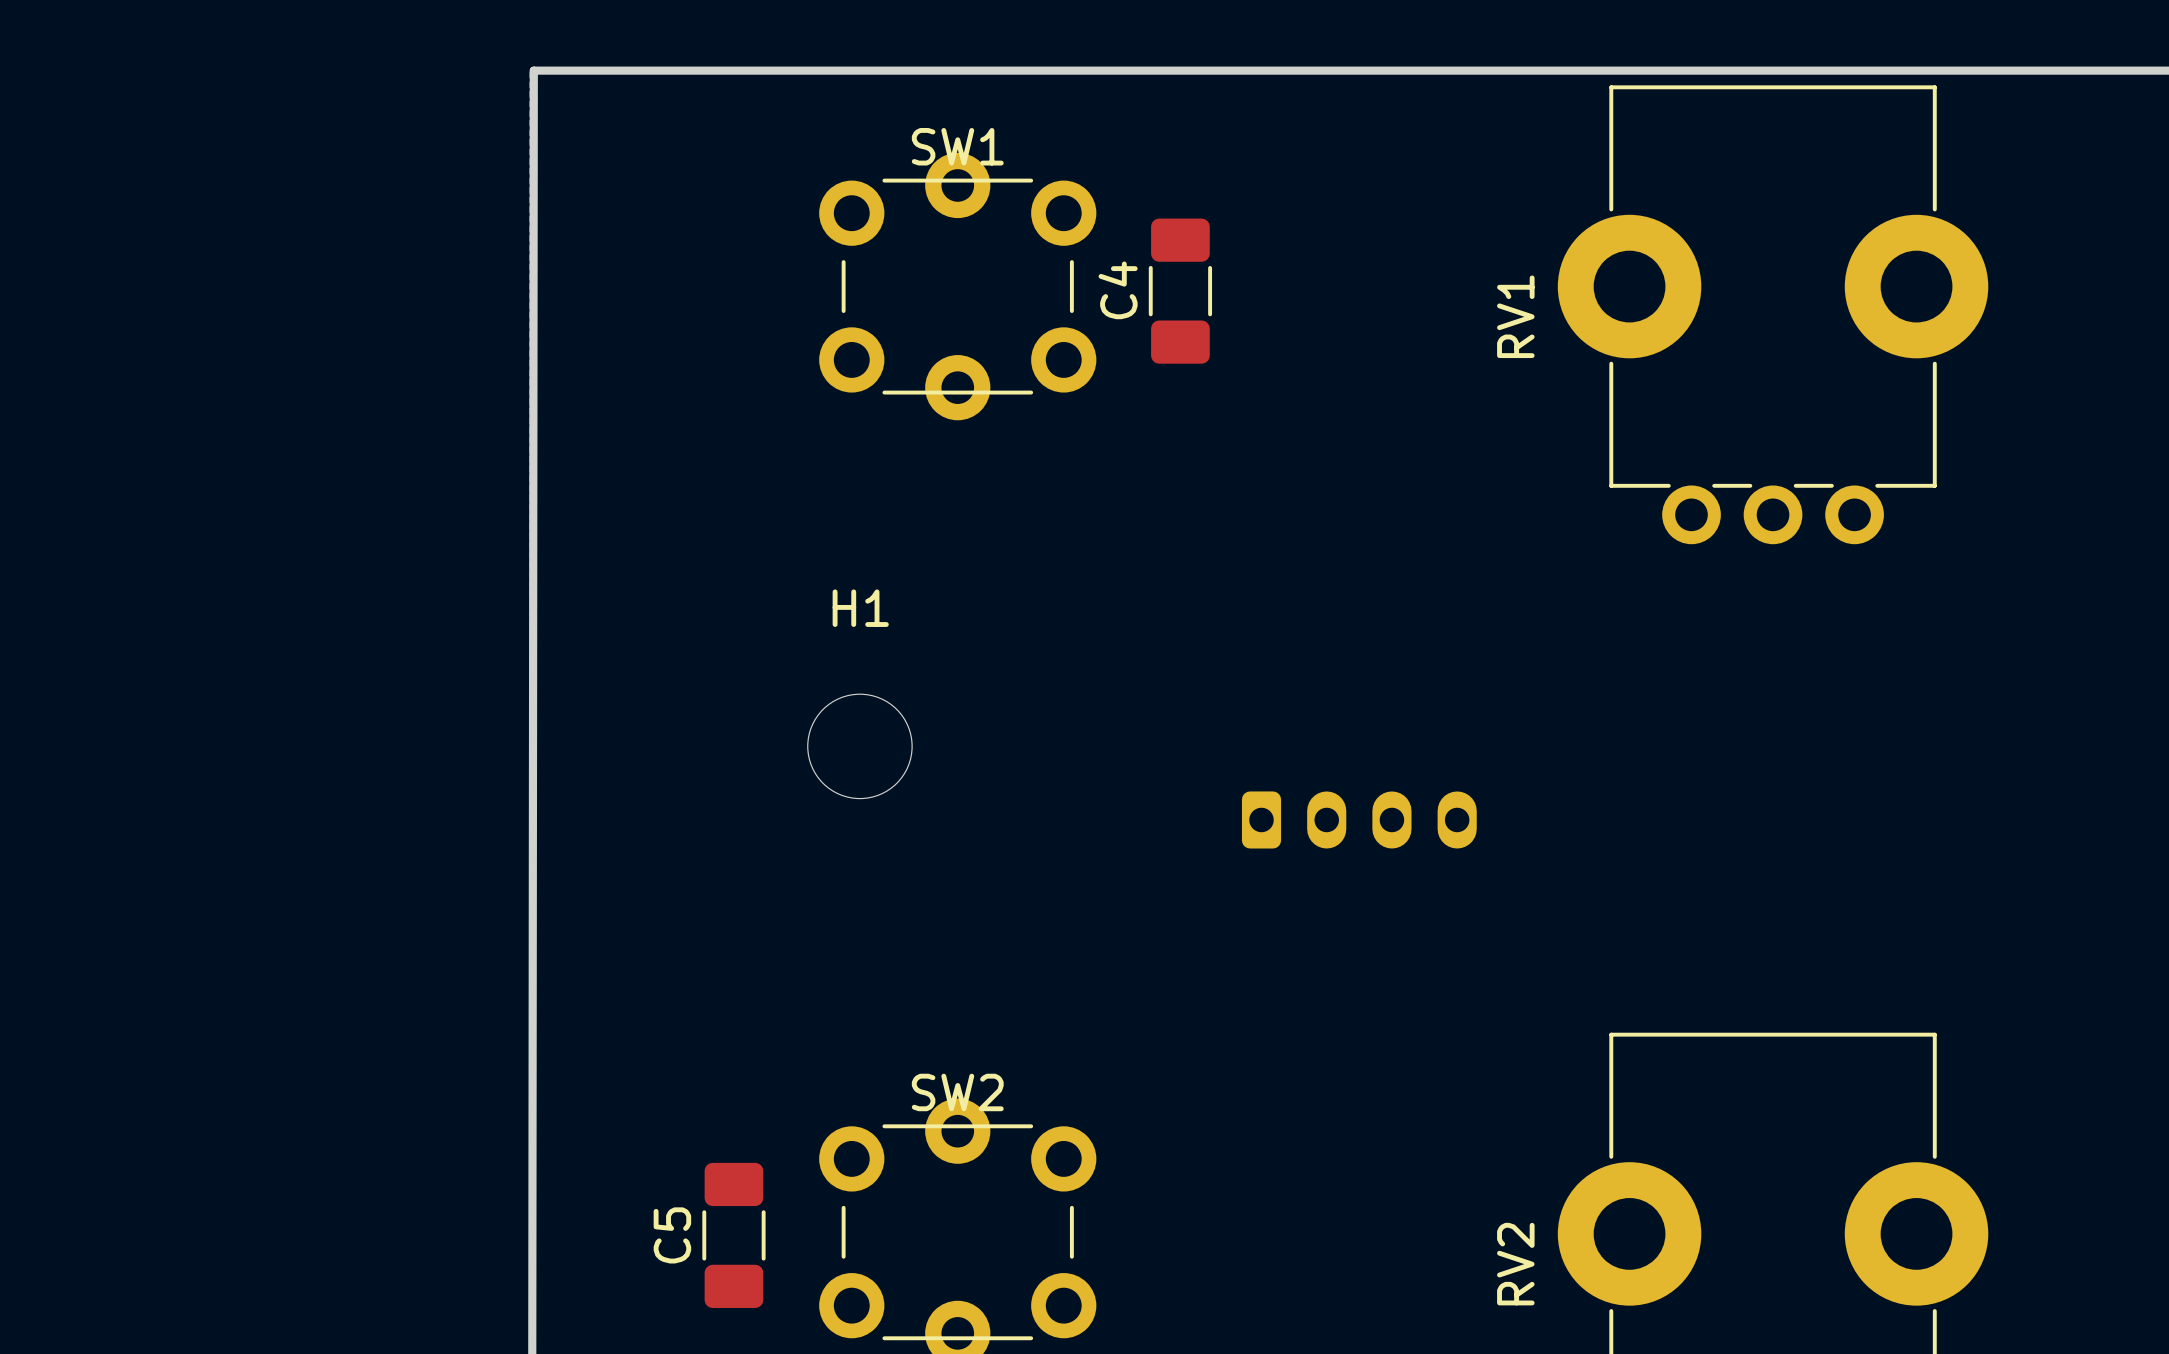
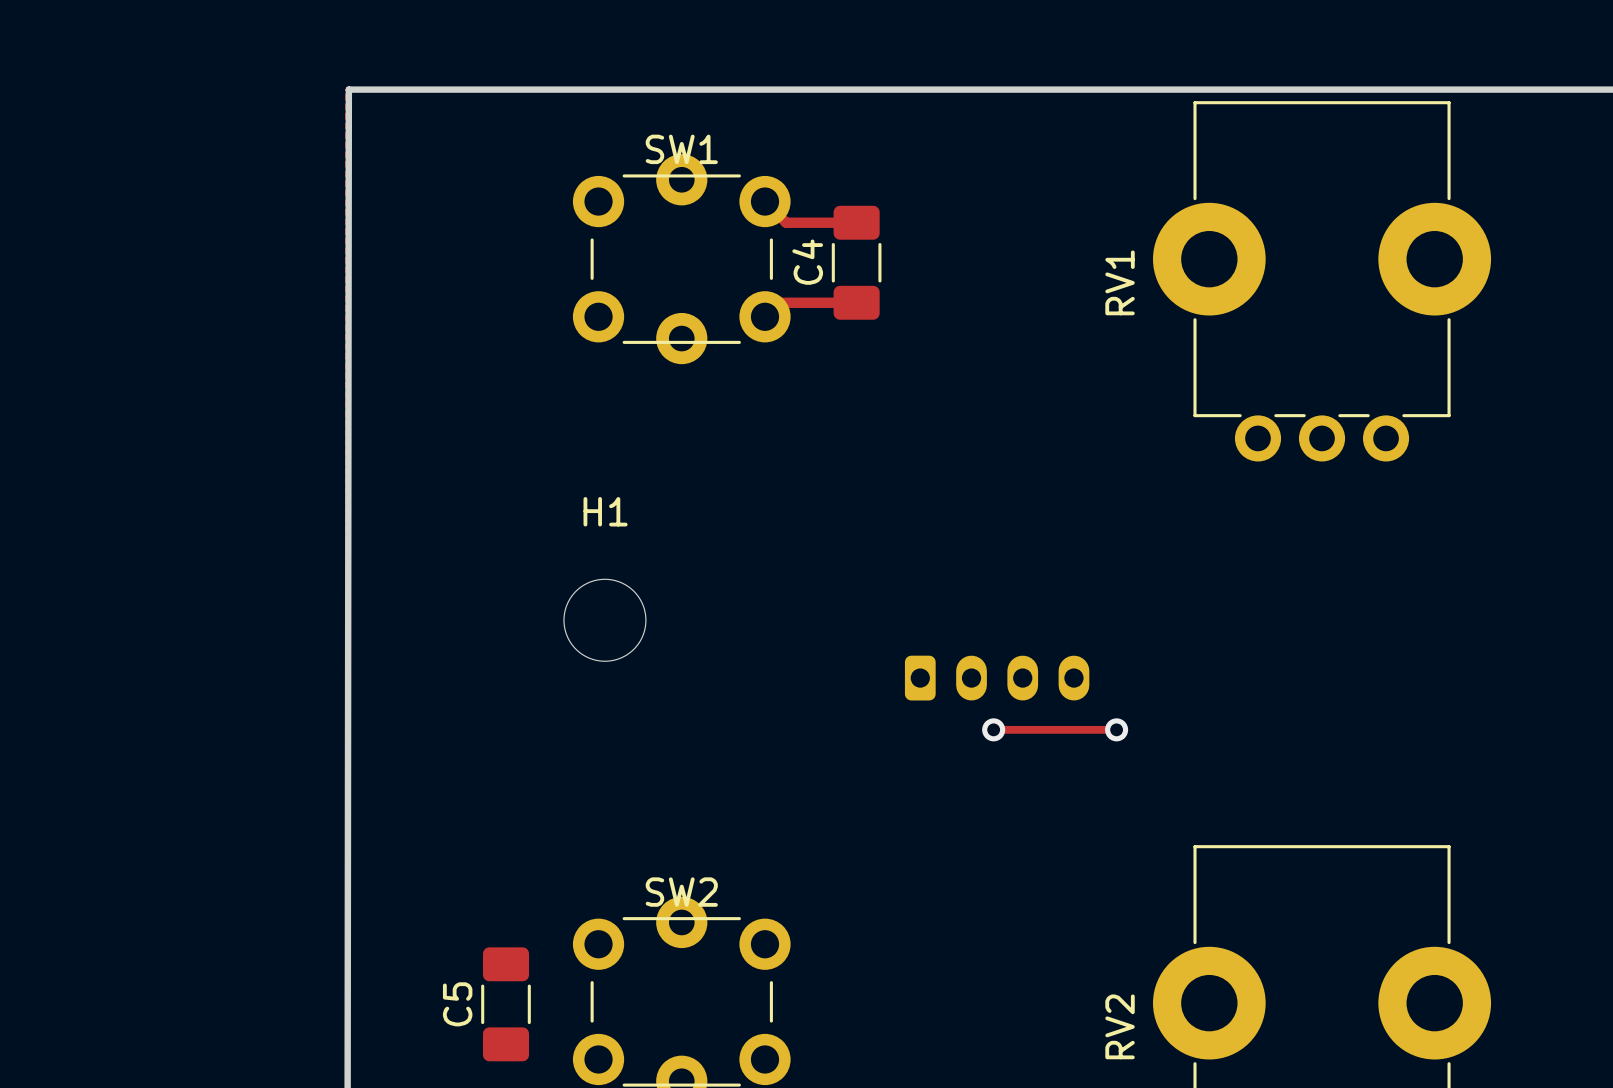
track: none -> (765, 201) (786, 222) (856, 222)
track: none -> (856, 302) (779, 302) (765, 316)
track: none -> (993, 729) (1116, 729)
via: none -> (993, 729)
via: none -> (1116, 729)

